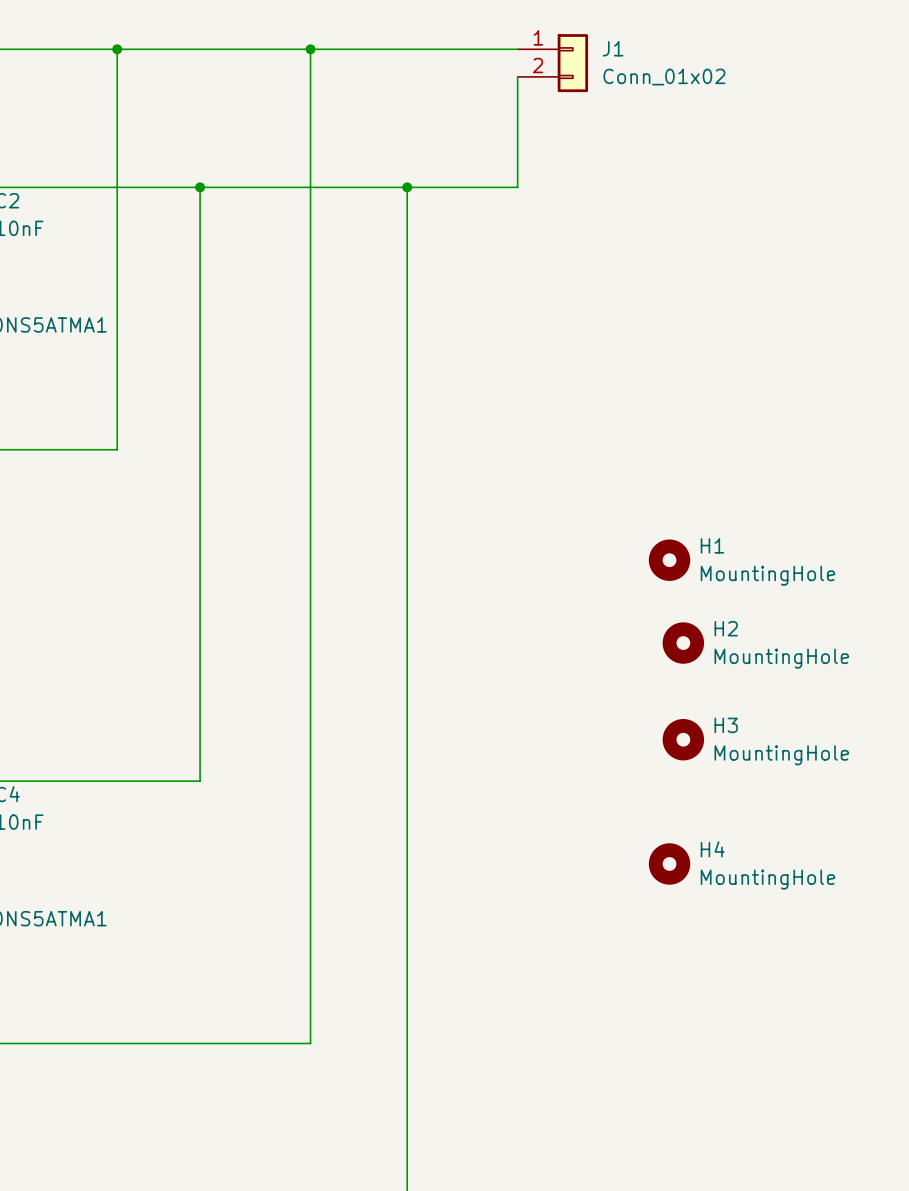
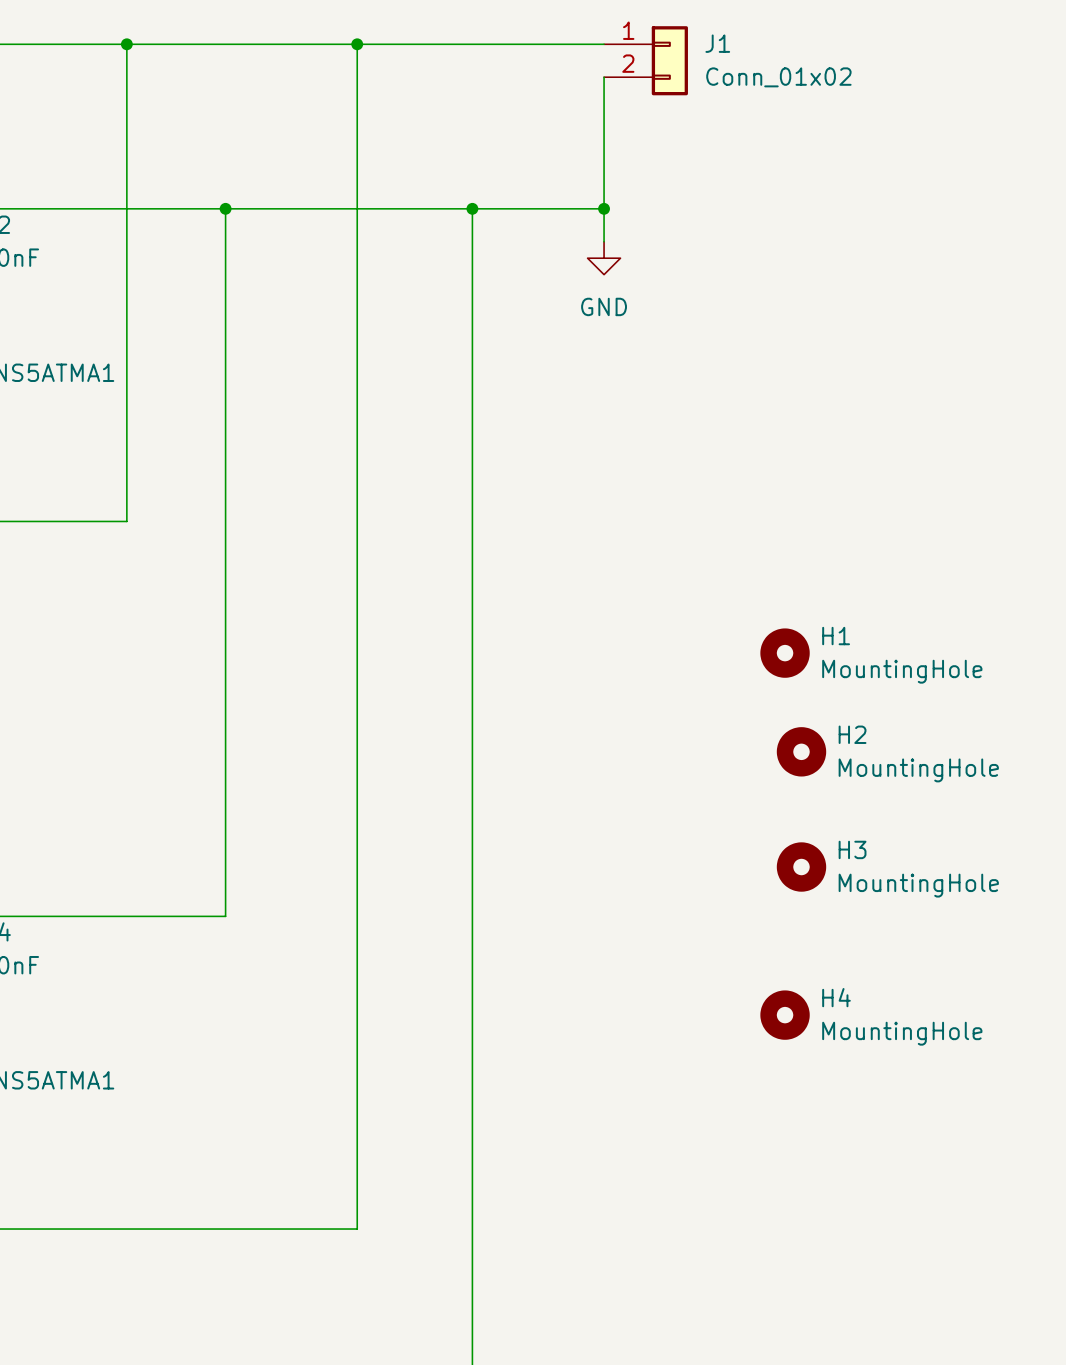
wire: none -> (604, 208) (604, 241)
junction: none -> (604, 208)
power symbol: none -> GND (604, 258)

